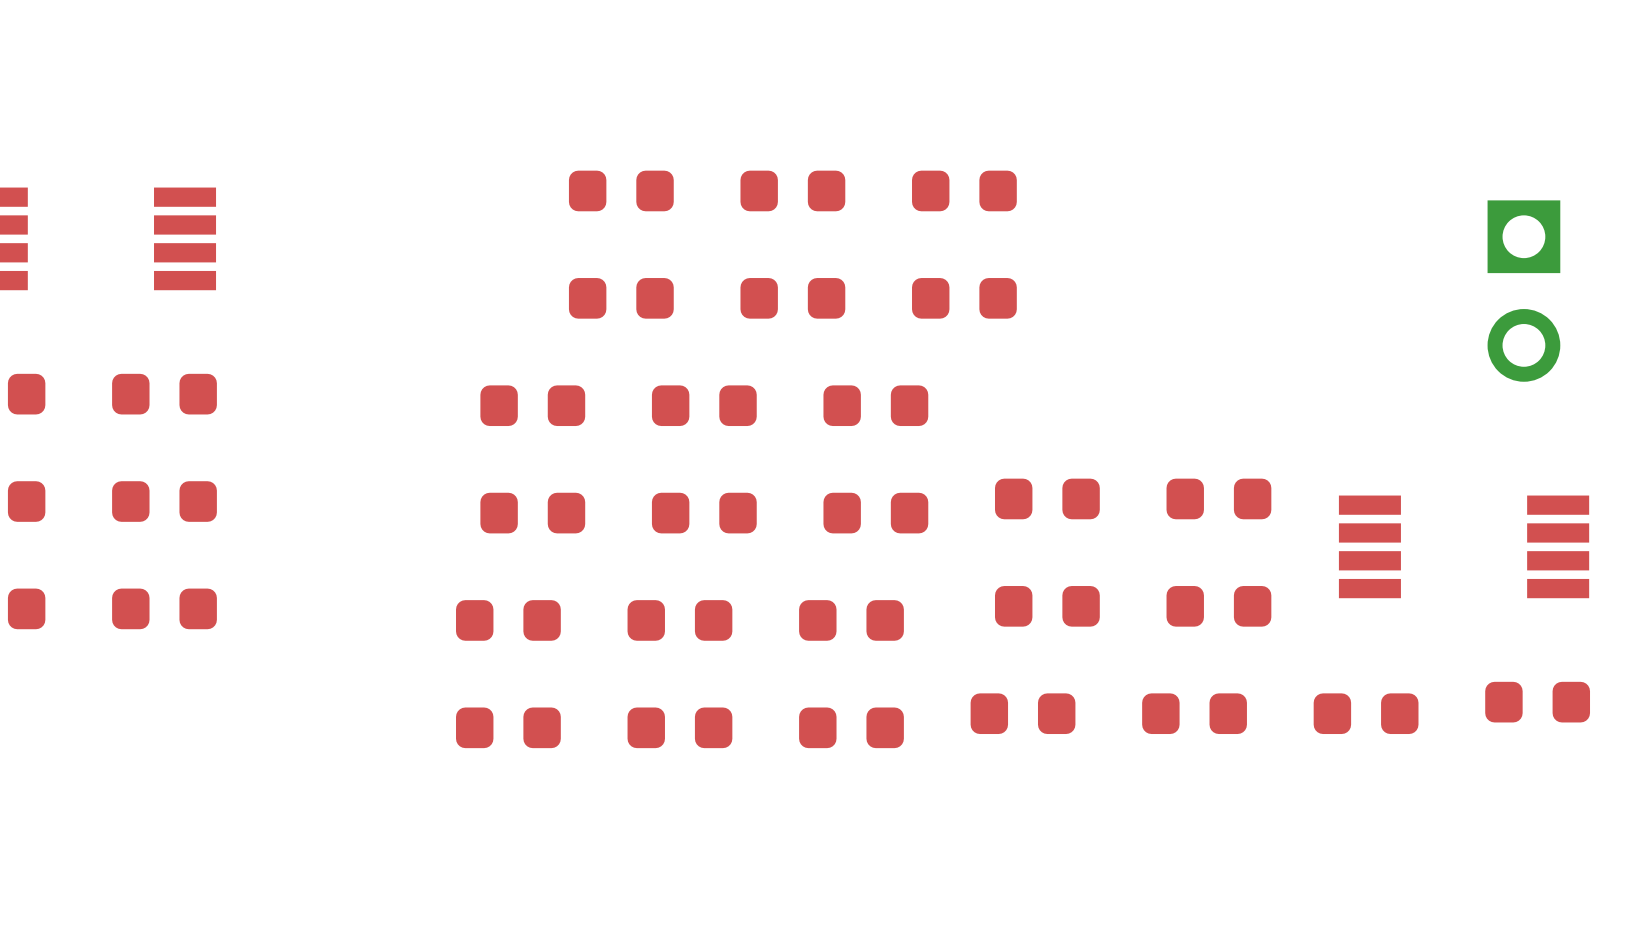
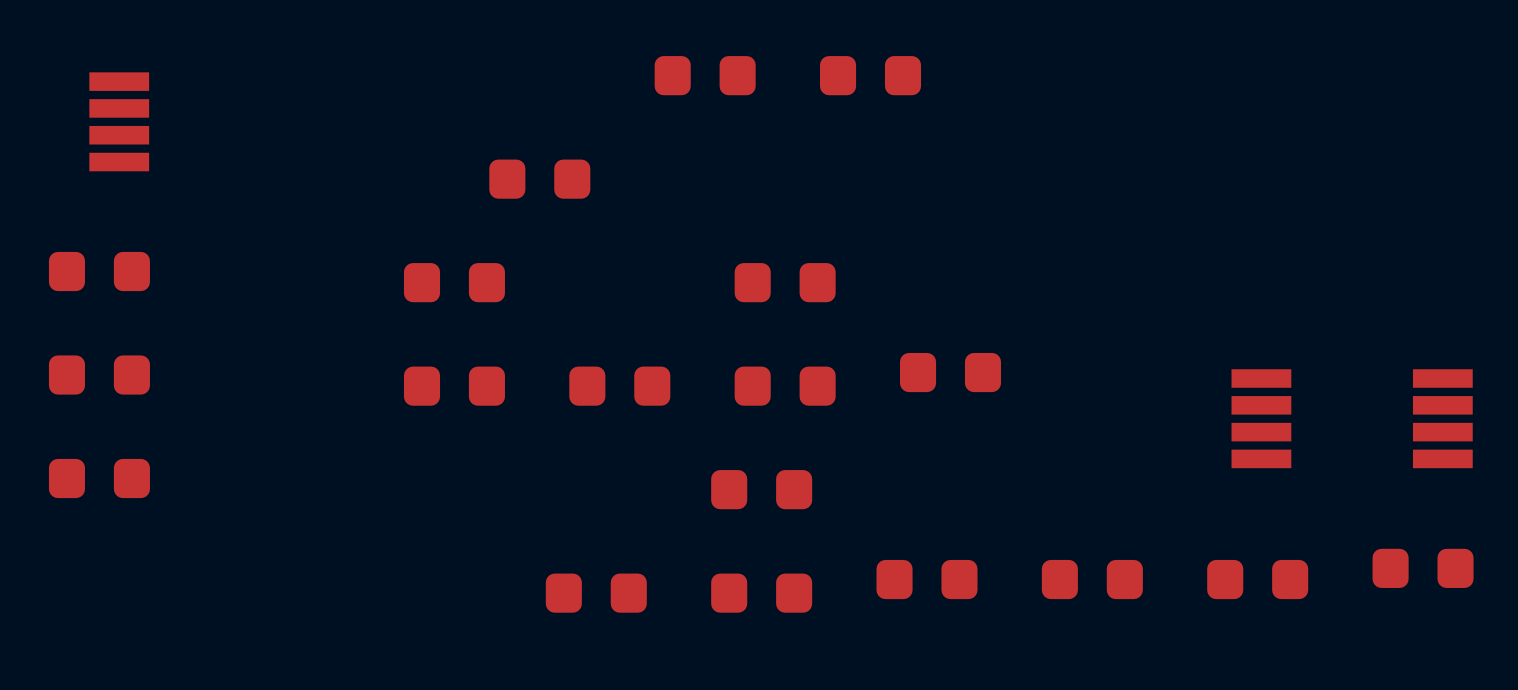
part: (621, 190) -> none
part: (1523, 291) -> none
part: (792, 298) -> none
part: (964, 298) -> none
part: (704, 405) -> none
part: (1218, 498) -> none
part: (1047, 606) -> none
part: (1218, 606) -> none
part: (508, 620) -> none
part: (679, 620) -> none
part: (508, 727) -> none

